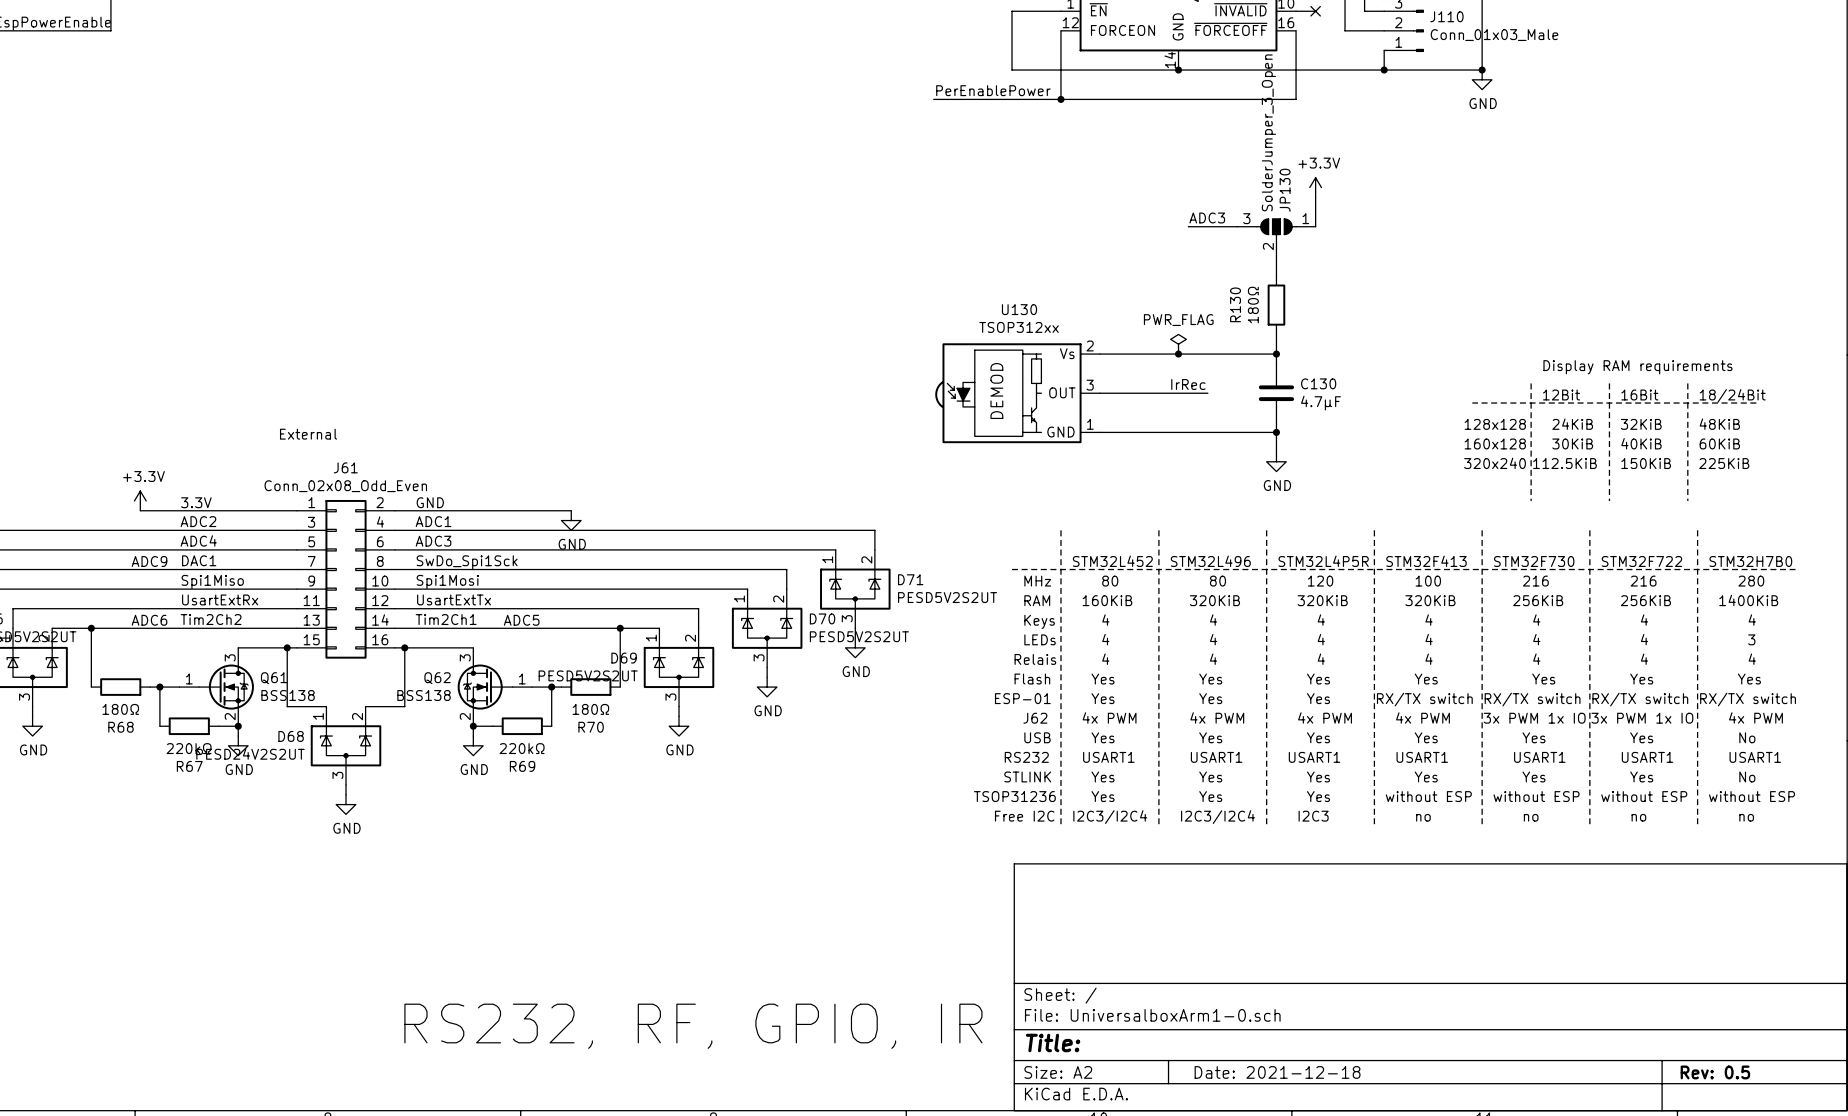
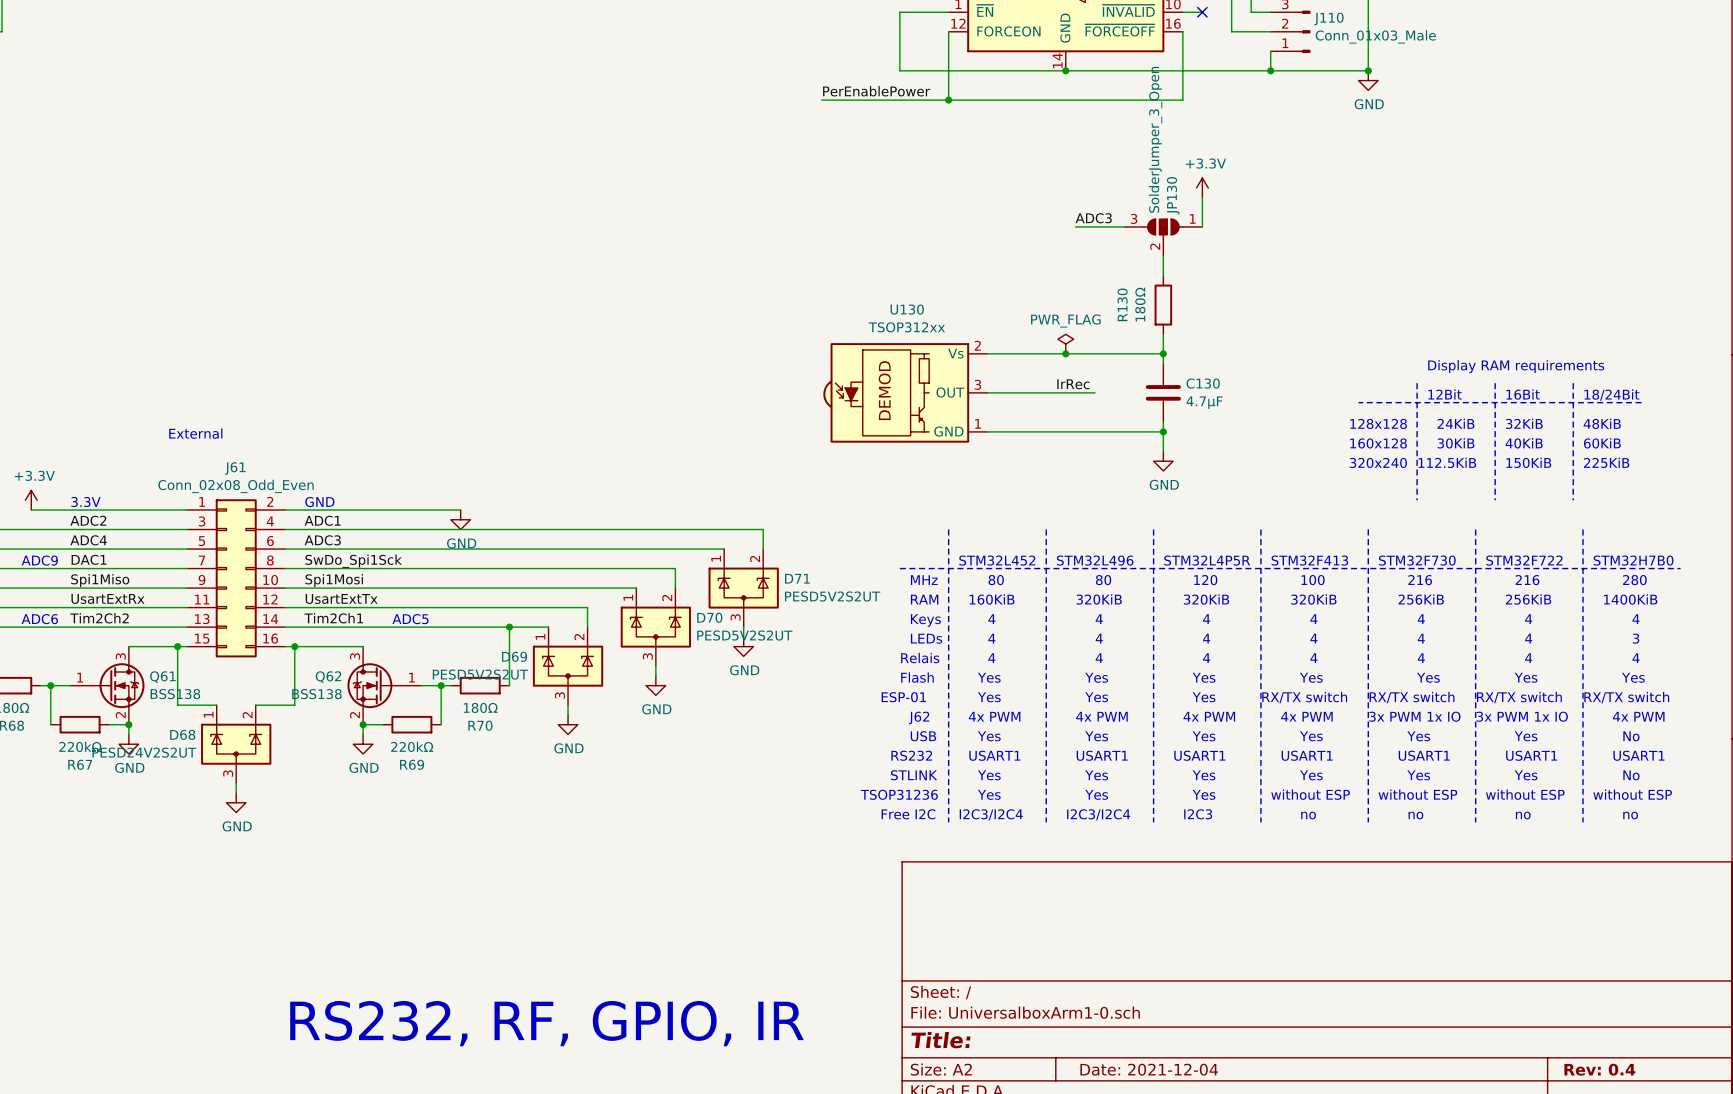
title block: Date: 2021-12-18 (1277, 1072) -> Date: 2021-12-04 (1149, 1069)
title block: Rev: 0.5 (1715, 1072) -> Rev: 0.4 (1599, 1069)

